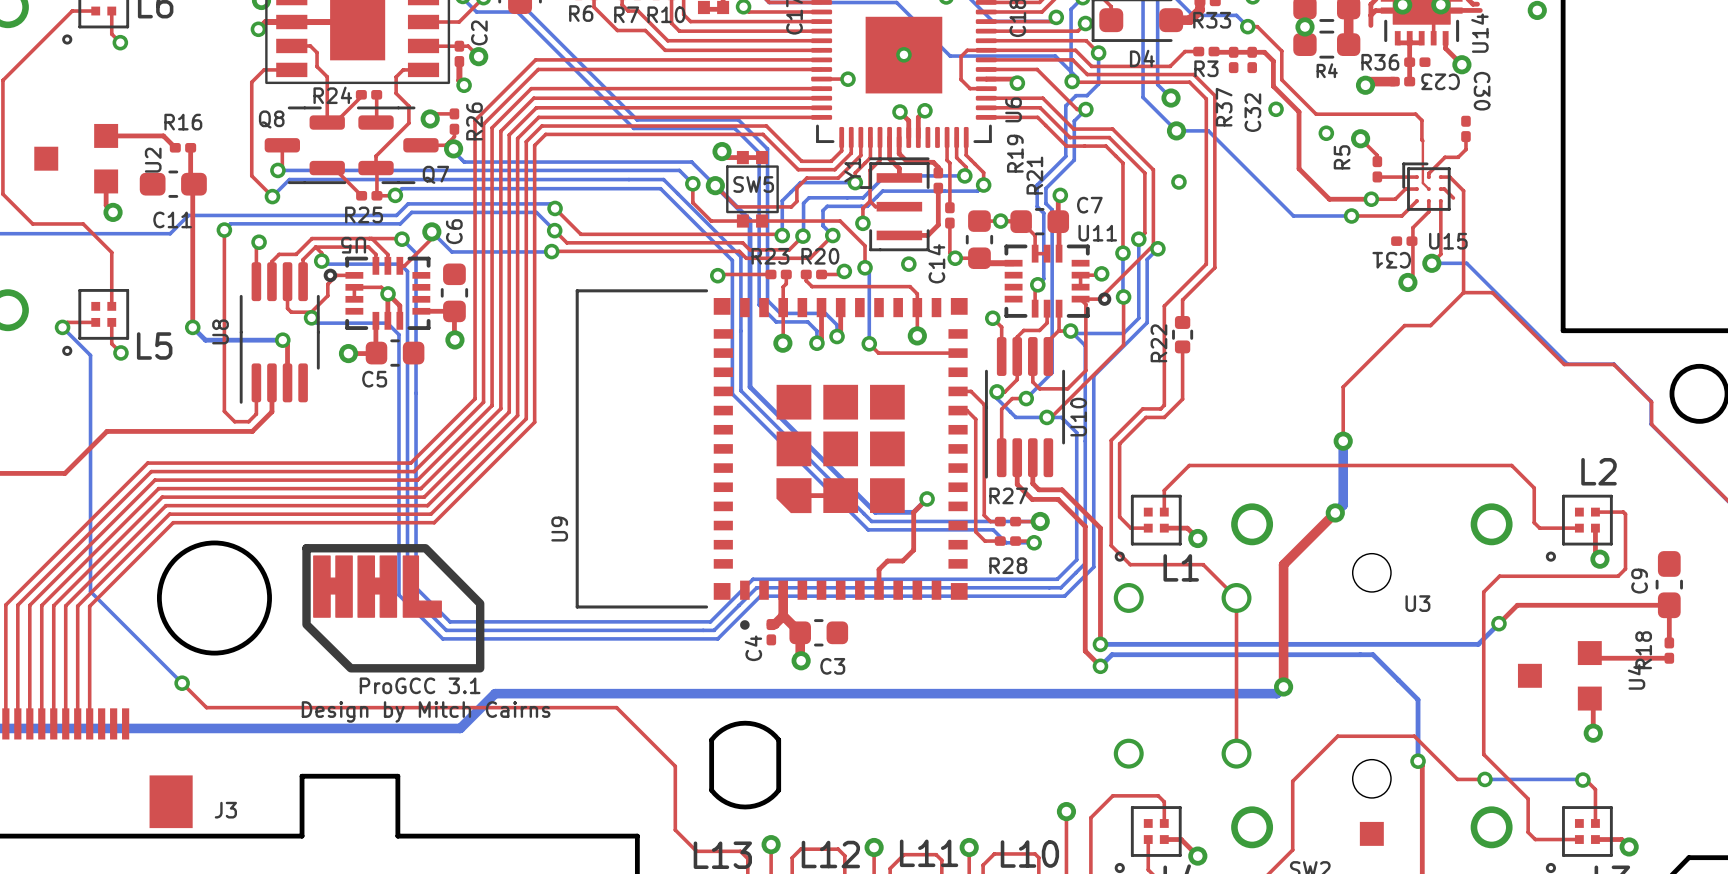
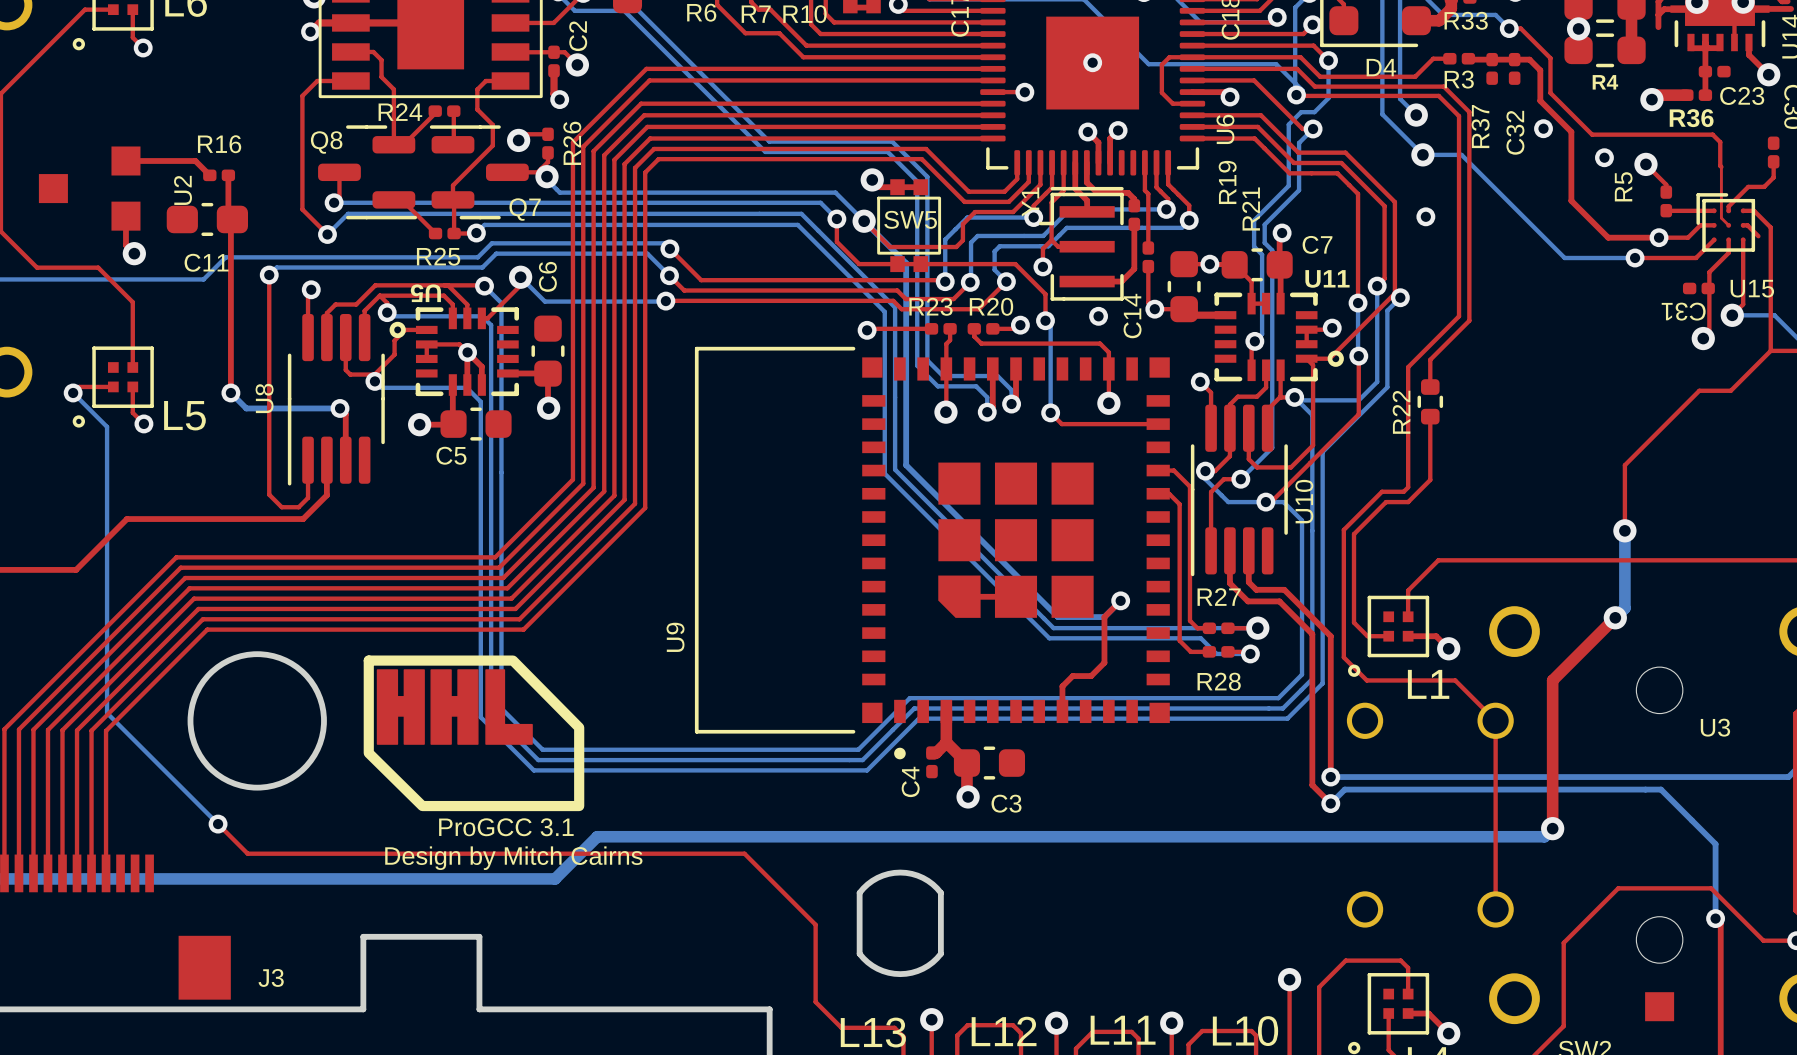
R36 name position: R36 (1380, 62) -> R36 (1691, 118)
C23 name rotation: 0° (1440, 81) -> 180° (1742, 95)

